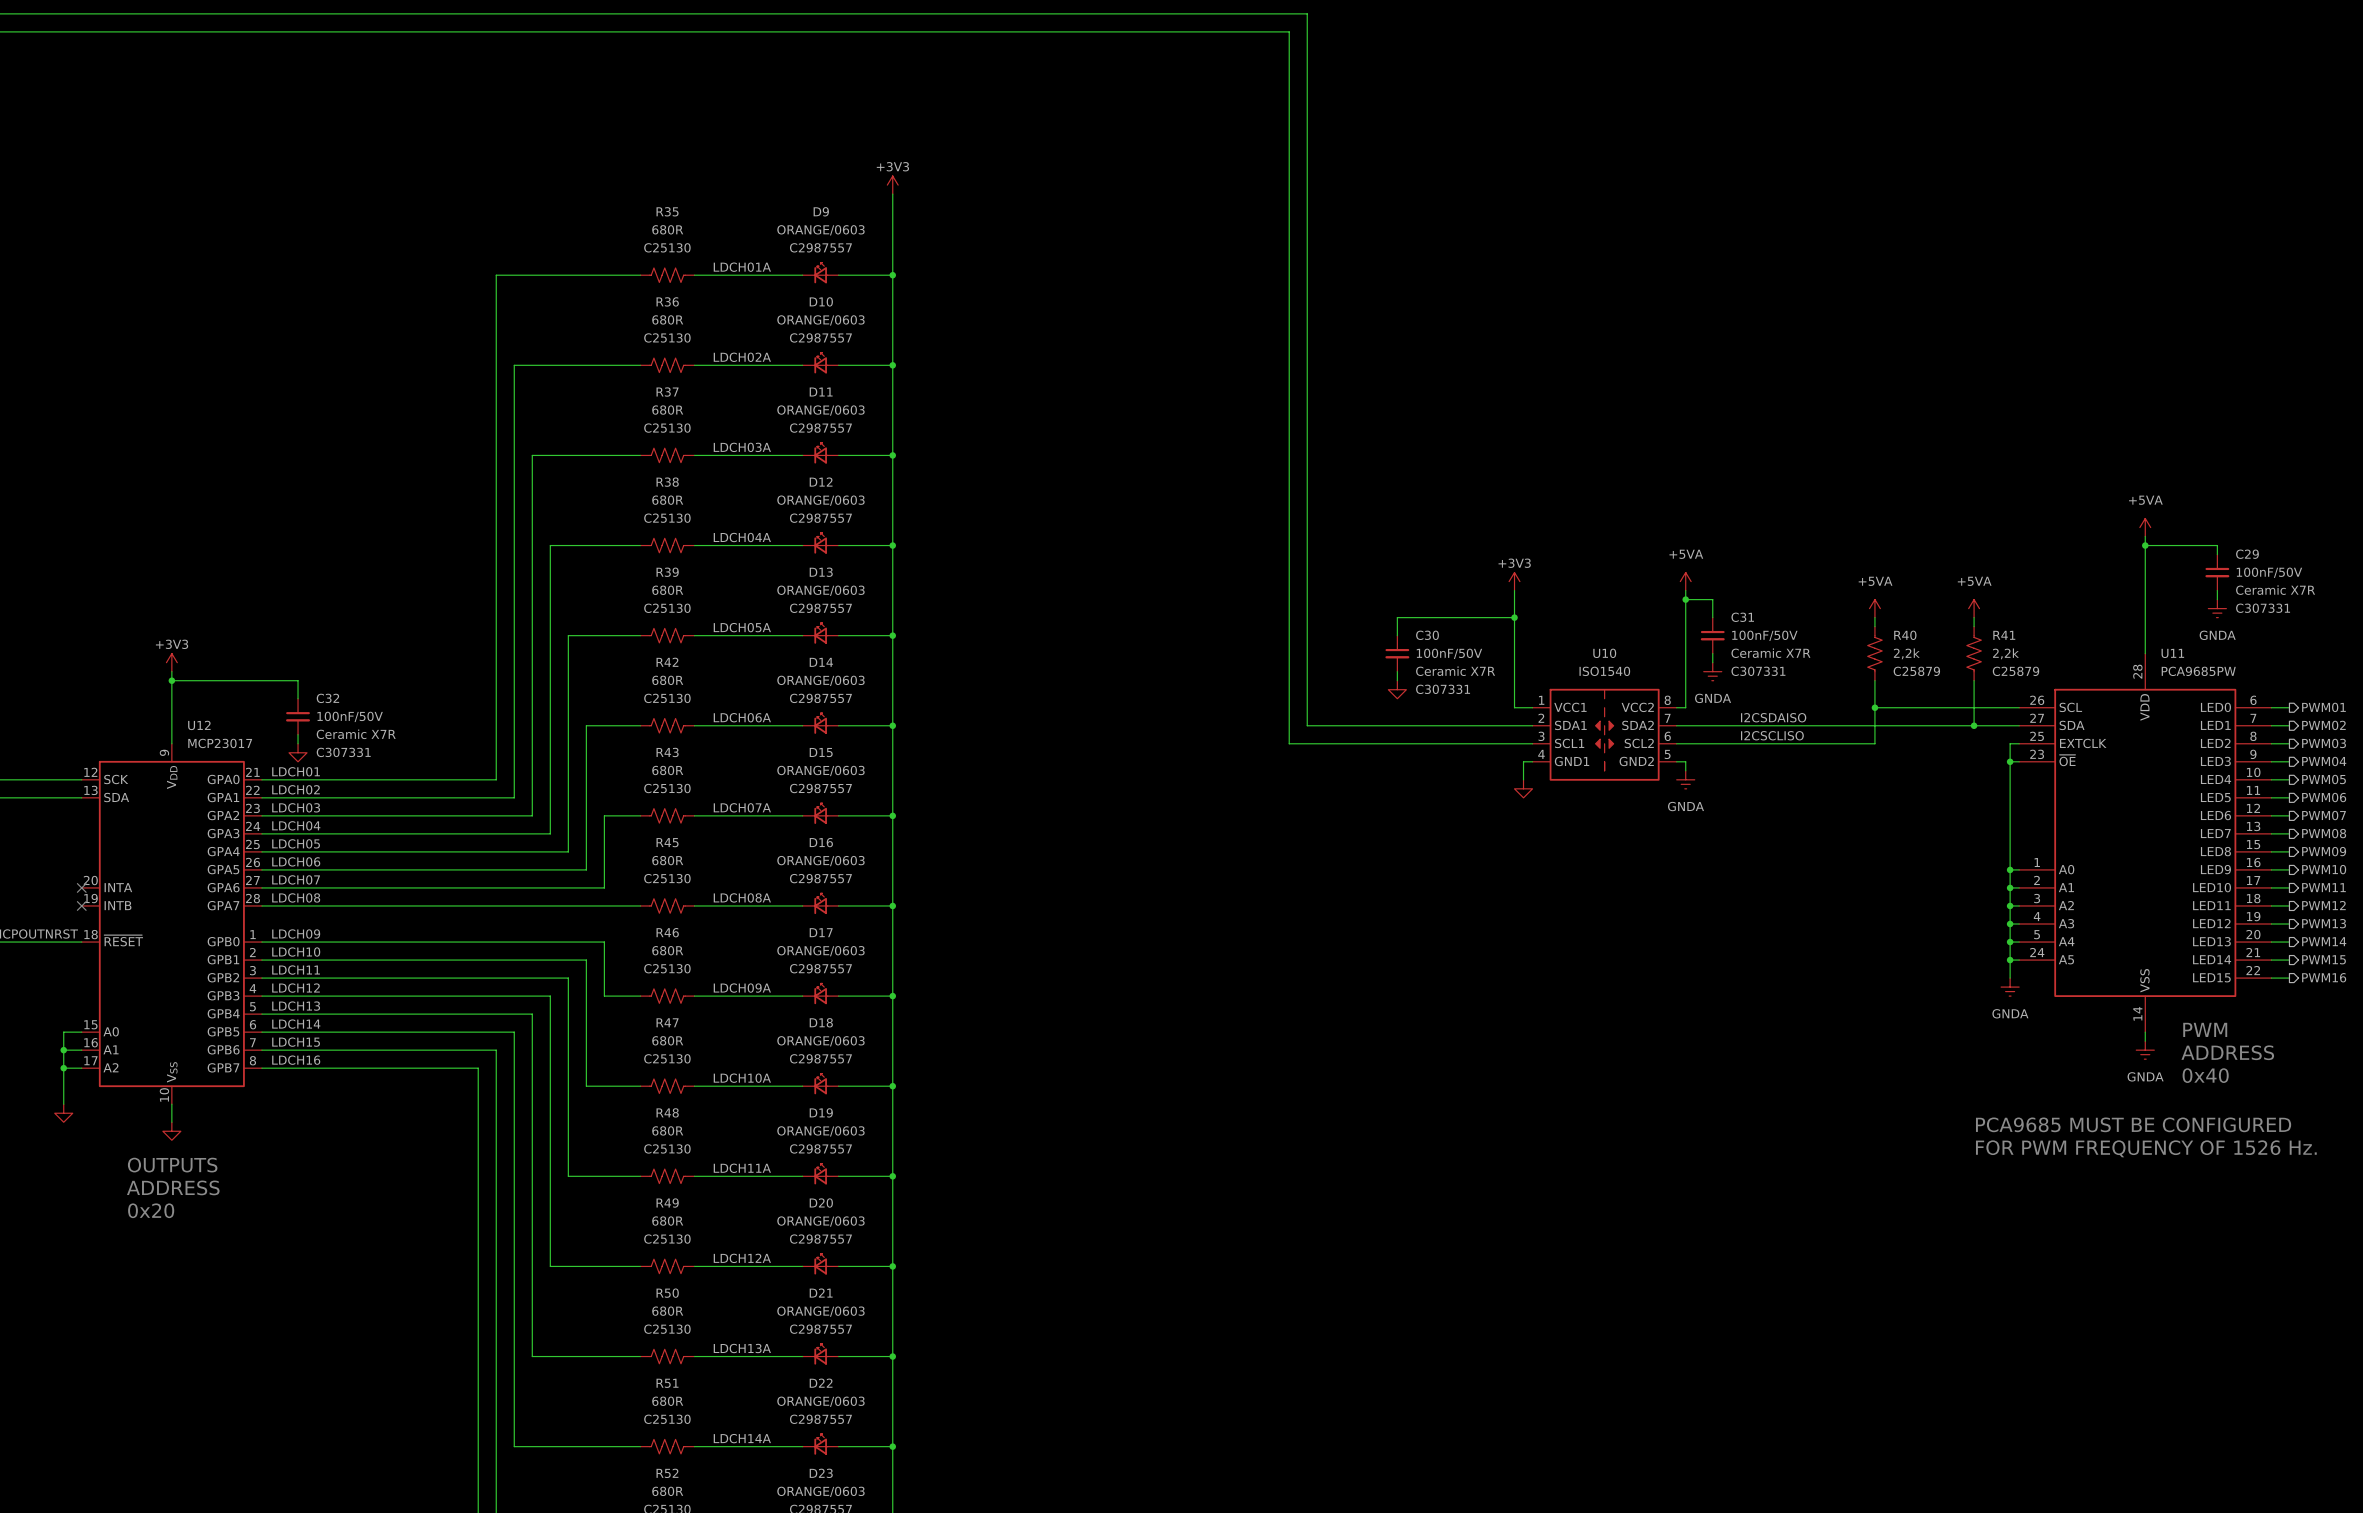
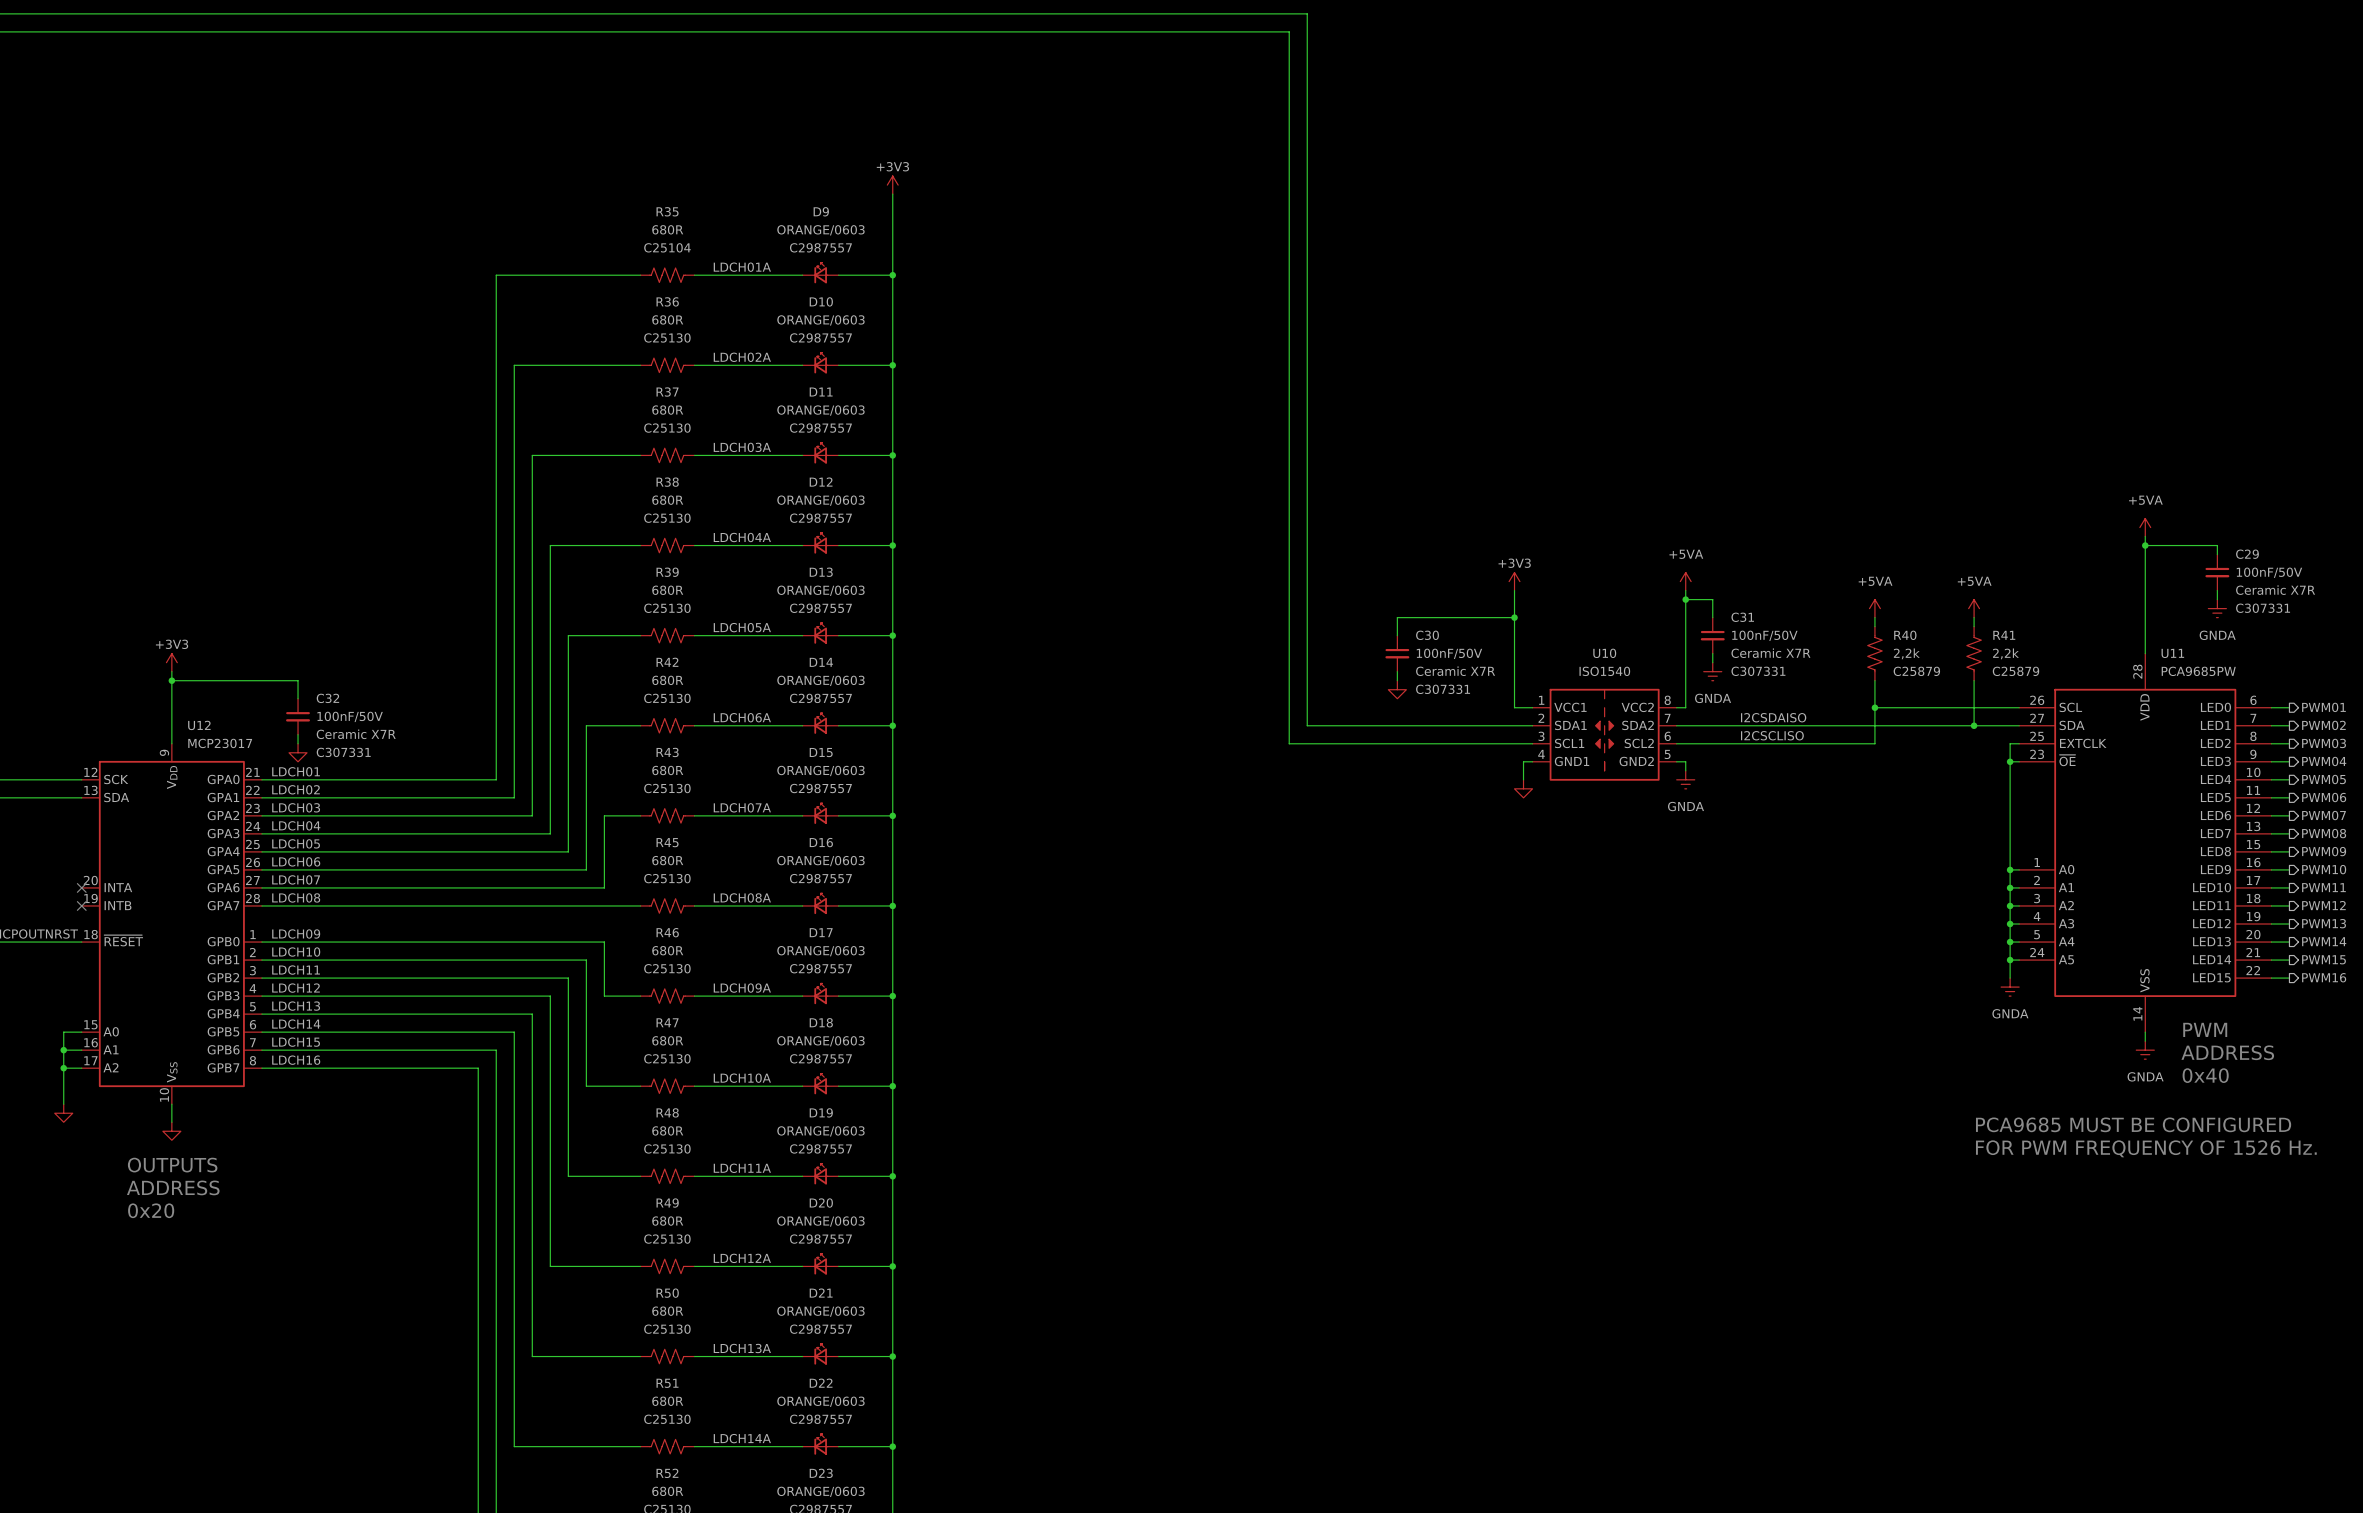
R35 text: C25130 (667, 247) -> C25104 (667, 247)

